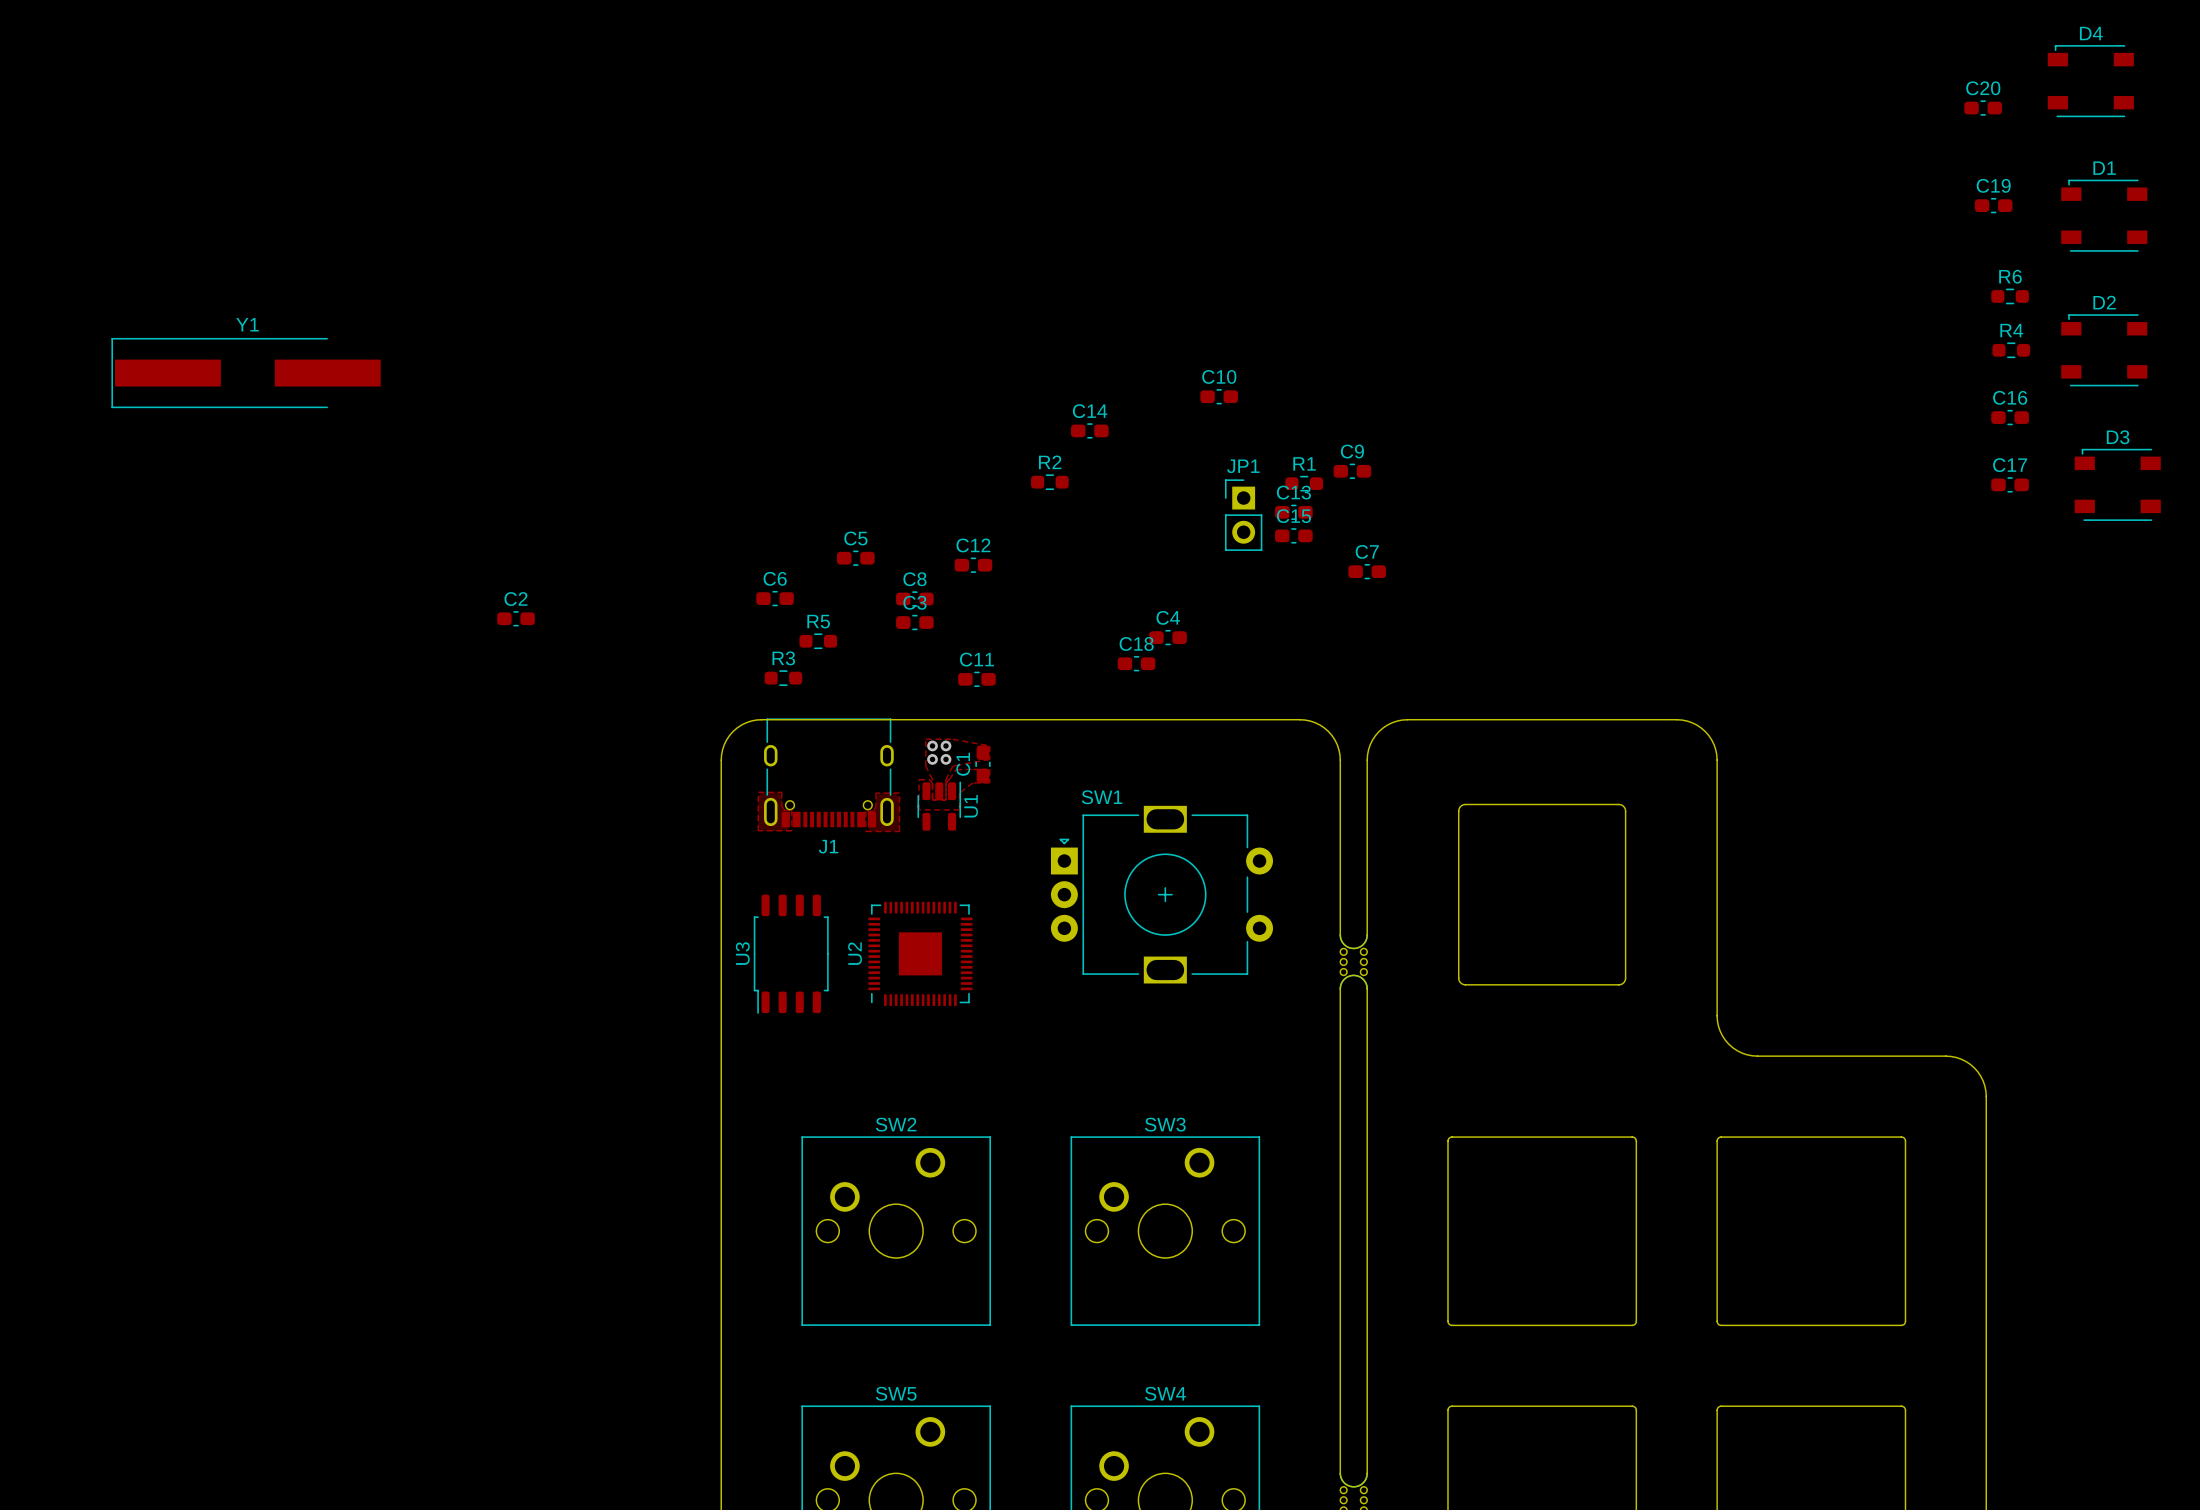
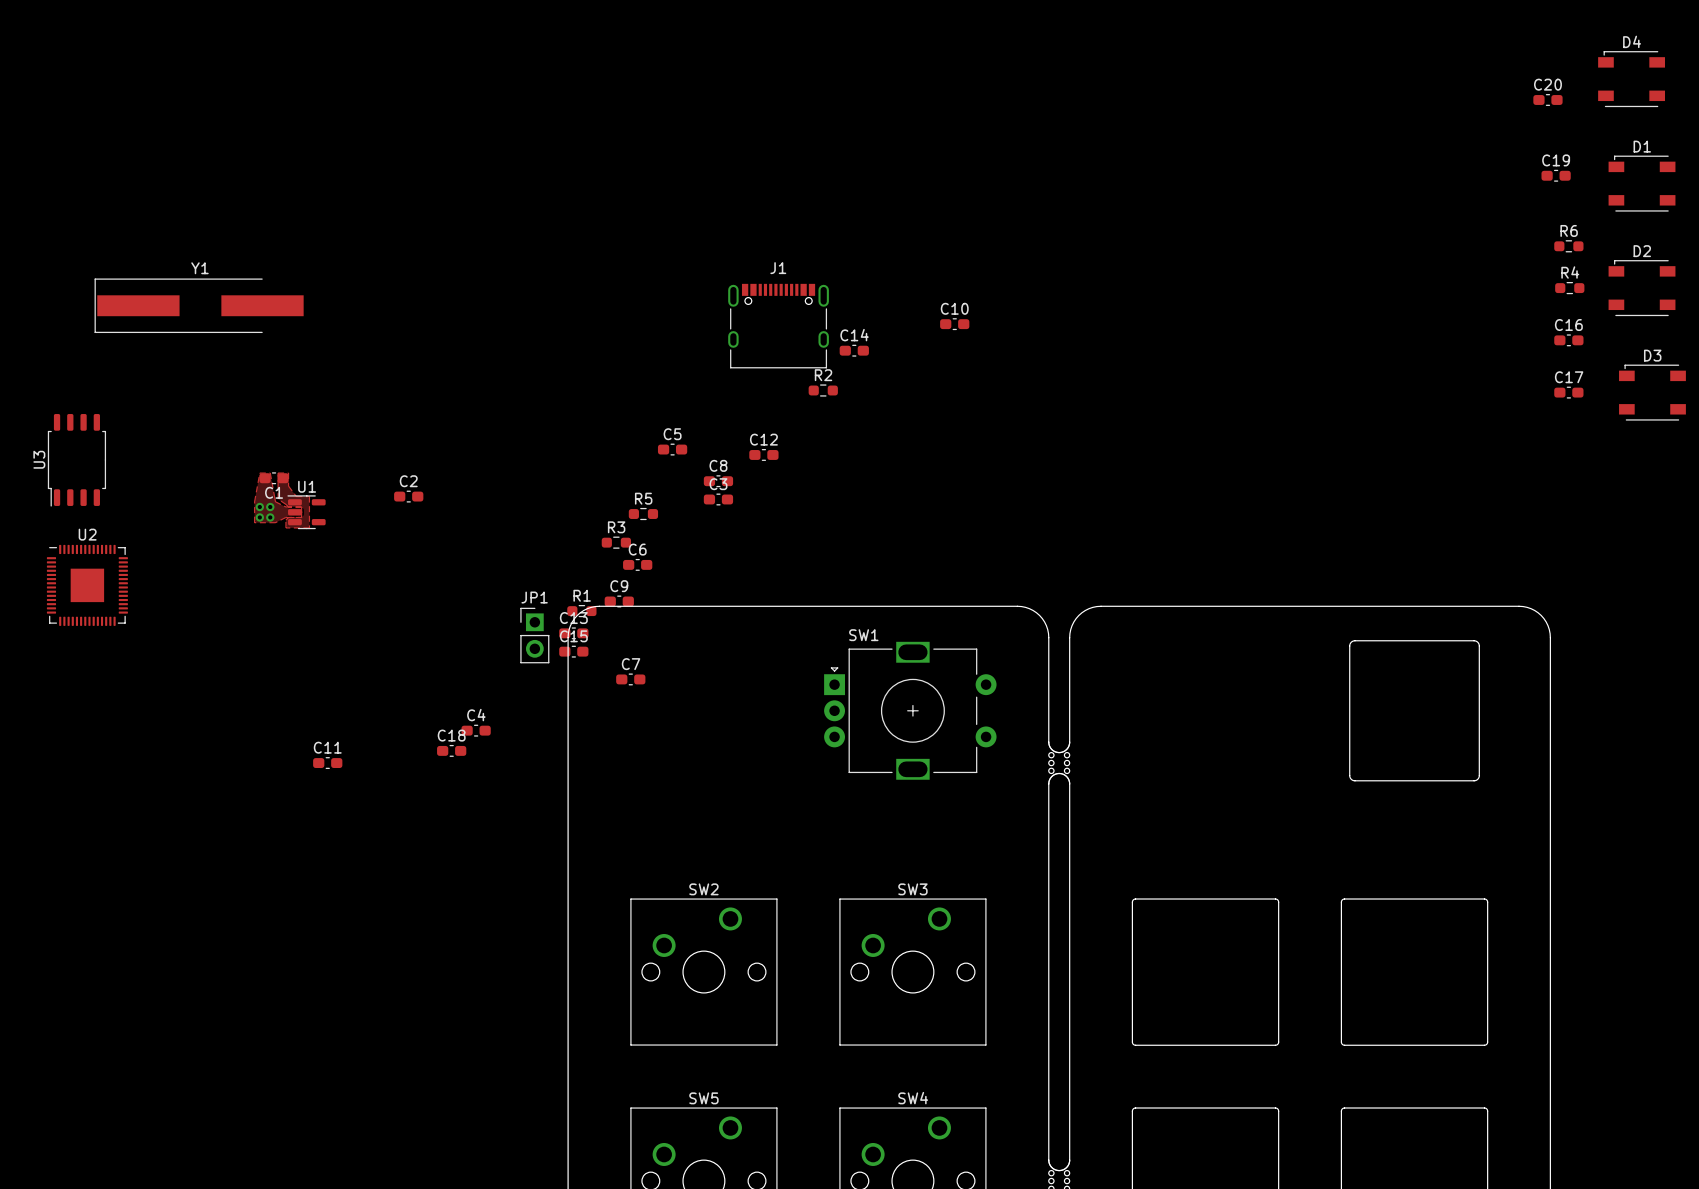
C9 position: (1352, 471) -> (619, 601)
R1 position: (1304, 483) -> (581, 611)
C13 position: (1293, 512) -> (573, 633)
JP1 position: (1243, 515) -> (534, 635)
C15 position: (1293, 535) -> (573, 651)
C7 position: (1367, 571) -> (630, 679)
zone outline: none -> (259, 473) (254, 501) (254, 522) (275, 522) (285, 517) (301, 517) (301, 507) (285, 507) (275, 501) (270, 473) (259, 473)
C6 position: (775, 598) -> (637, 564)
via: none -> (259, 507)
via: none -> (270, 507)
zone outline: none -> (288, 507) (278, 499) (278, 473) (288, 473) (288, 486) (296, 496) (309, 496) (309, 527) (285, 527) (285, 520) (288, 517)
C4 position: (1168, 637) -> (476, 730)
via: none -> (259, 517)
via: none -> (270, 517)
C18 position: (1136, 663) -> (451, 750)
C11 position: (976, 679) -> (327, 763)
zone outline: (925, 739) (925, 766) (932, 779) (932, 799) (945, 799) (945, 779) (952, 766) (989, 759) (989, 745) (952, 739) (925, 739) -> none
via: (932, 745) -> none
via: (945, 745) -> none
via: (932, 759) -> none
via: (945, 759) -> none
C1 name position: C1 (963, 764) -> C1 (274, 492)
C1 rotation: 0° (982, 764) -> 90° clockwise (274, 478)
C1 position: (982, 764) -> (274, 478)
J1 rotation: 0° (828, 772) -> 180° (778, 326)
J1 position: (828, 772) -> (778, 326)
zone outline: (932, 782) (929, 779) (919, 779) (919, 809) (959, 809) (959, 793) (972, 782) (989, 782) (989, 769) (956, 769) (945, 782) -> none
zone outline: (758, 792) (758, 830) (791, 830) (791, 810) (784, 810) (781, 805) (781, 792) (758, 792) -> none
zone outline: (875, 793) (899, 793) (899, 831) (865, 831) (865, 811) (873, 811) (875, 806) (875, 793) -> none
board edge: (721, 800) (721, 754) (726, 739) (741, 725) (761, 719) (1305, 720) (1324, 728) (1337, 744) (1340, 760) (1340, 800) -> (568, 637) (570, 625) (577, 615) (587, 608) (599, 606) (1021, 606) (1033, 610) (1039, 615) (1046, 625) (1048, 637)
board edge: (1367, 800) (1367, 760) (1370, 744) (1383, 728) (1397, 721) (1676, 719) (1692, 722) (1708, 735) (1716, 754) (1717, 1015) (1718, 1026) (1725, 1040) (1737, 1050) (1752, 1055) (1956, 1057) (1966, 1061) (1977, 1071) (1983, 1081) (1986, 1096) -> (1069, 637) (1072, 625) (1078, 615) (1089, 608) (1101, 606) (1519, 606) (1531, 608) (1543, 618) (1550, 633) (1550, 867)
board edge: (1465, 804) (1618, 804) (1623, 806) (1625, 811) (1625, 978) (1623, 982) (1618, 984) (1465, 984) (1460, 982) (1458, 978) (1458, 811) (1460, 806) (1465, 804) -> (1354, 640) (1477, 642) (1479, 646) (1477, 779) (1474, 780) (1351, 779) (1349, 646) (1351, 642) (1354, 640)
U1 rotation: 0° (939, 806) -> 90° counterclockwise (306, 512)
U1 position: (939, 806) -> (306, 512)
U2 rotation: 0° (920, 953) -> 90° clockwise (87, 585)
U2 position: (920, 953) -> (87, 585)
U3 position: (791, 954) -> (76, 460)

